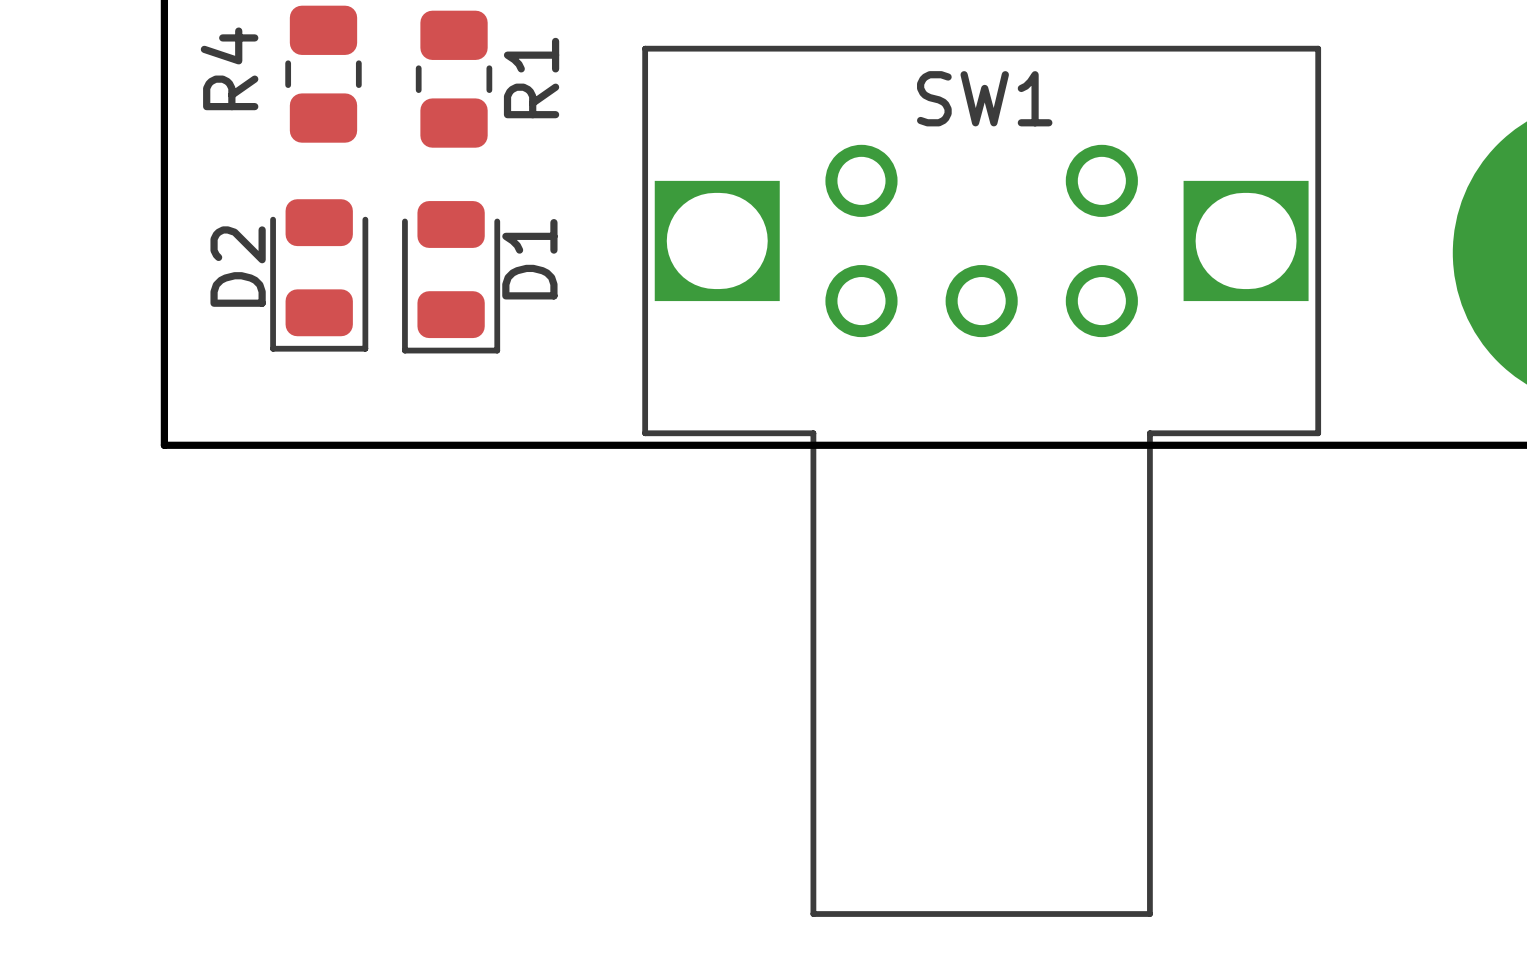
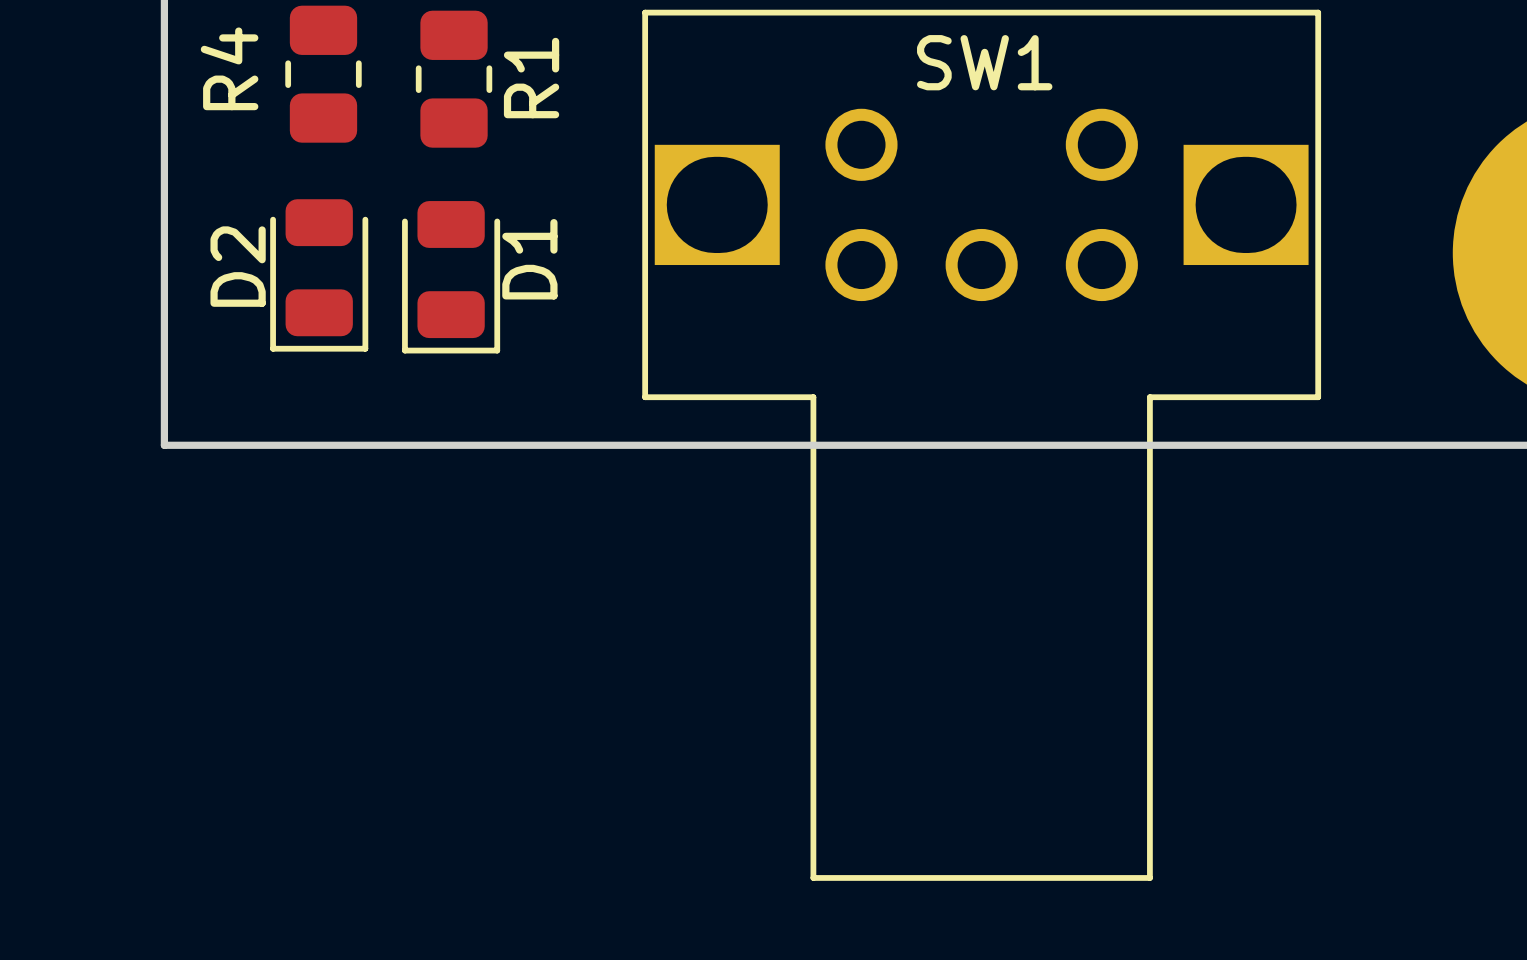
SW1 position: (981, 481) -> (981, 445)

